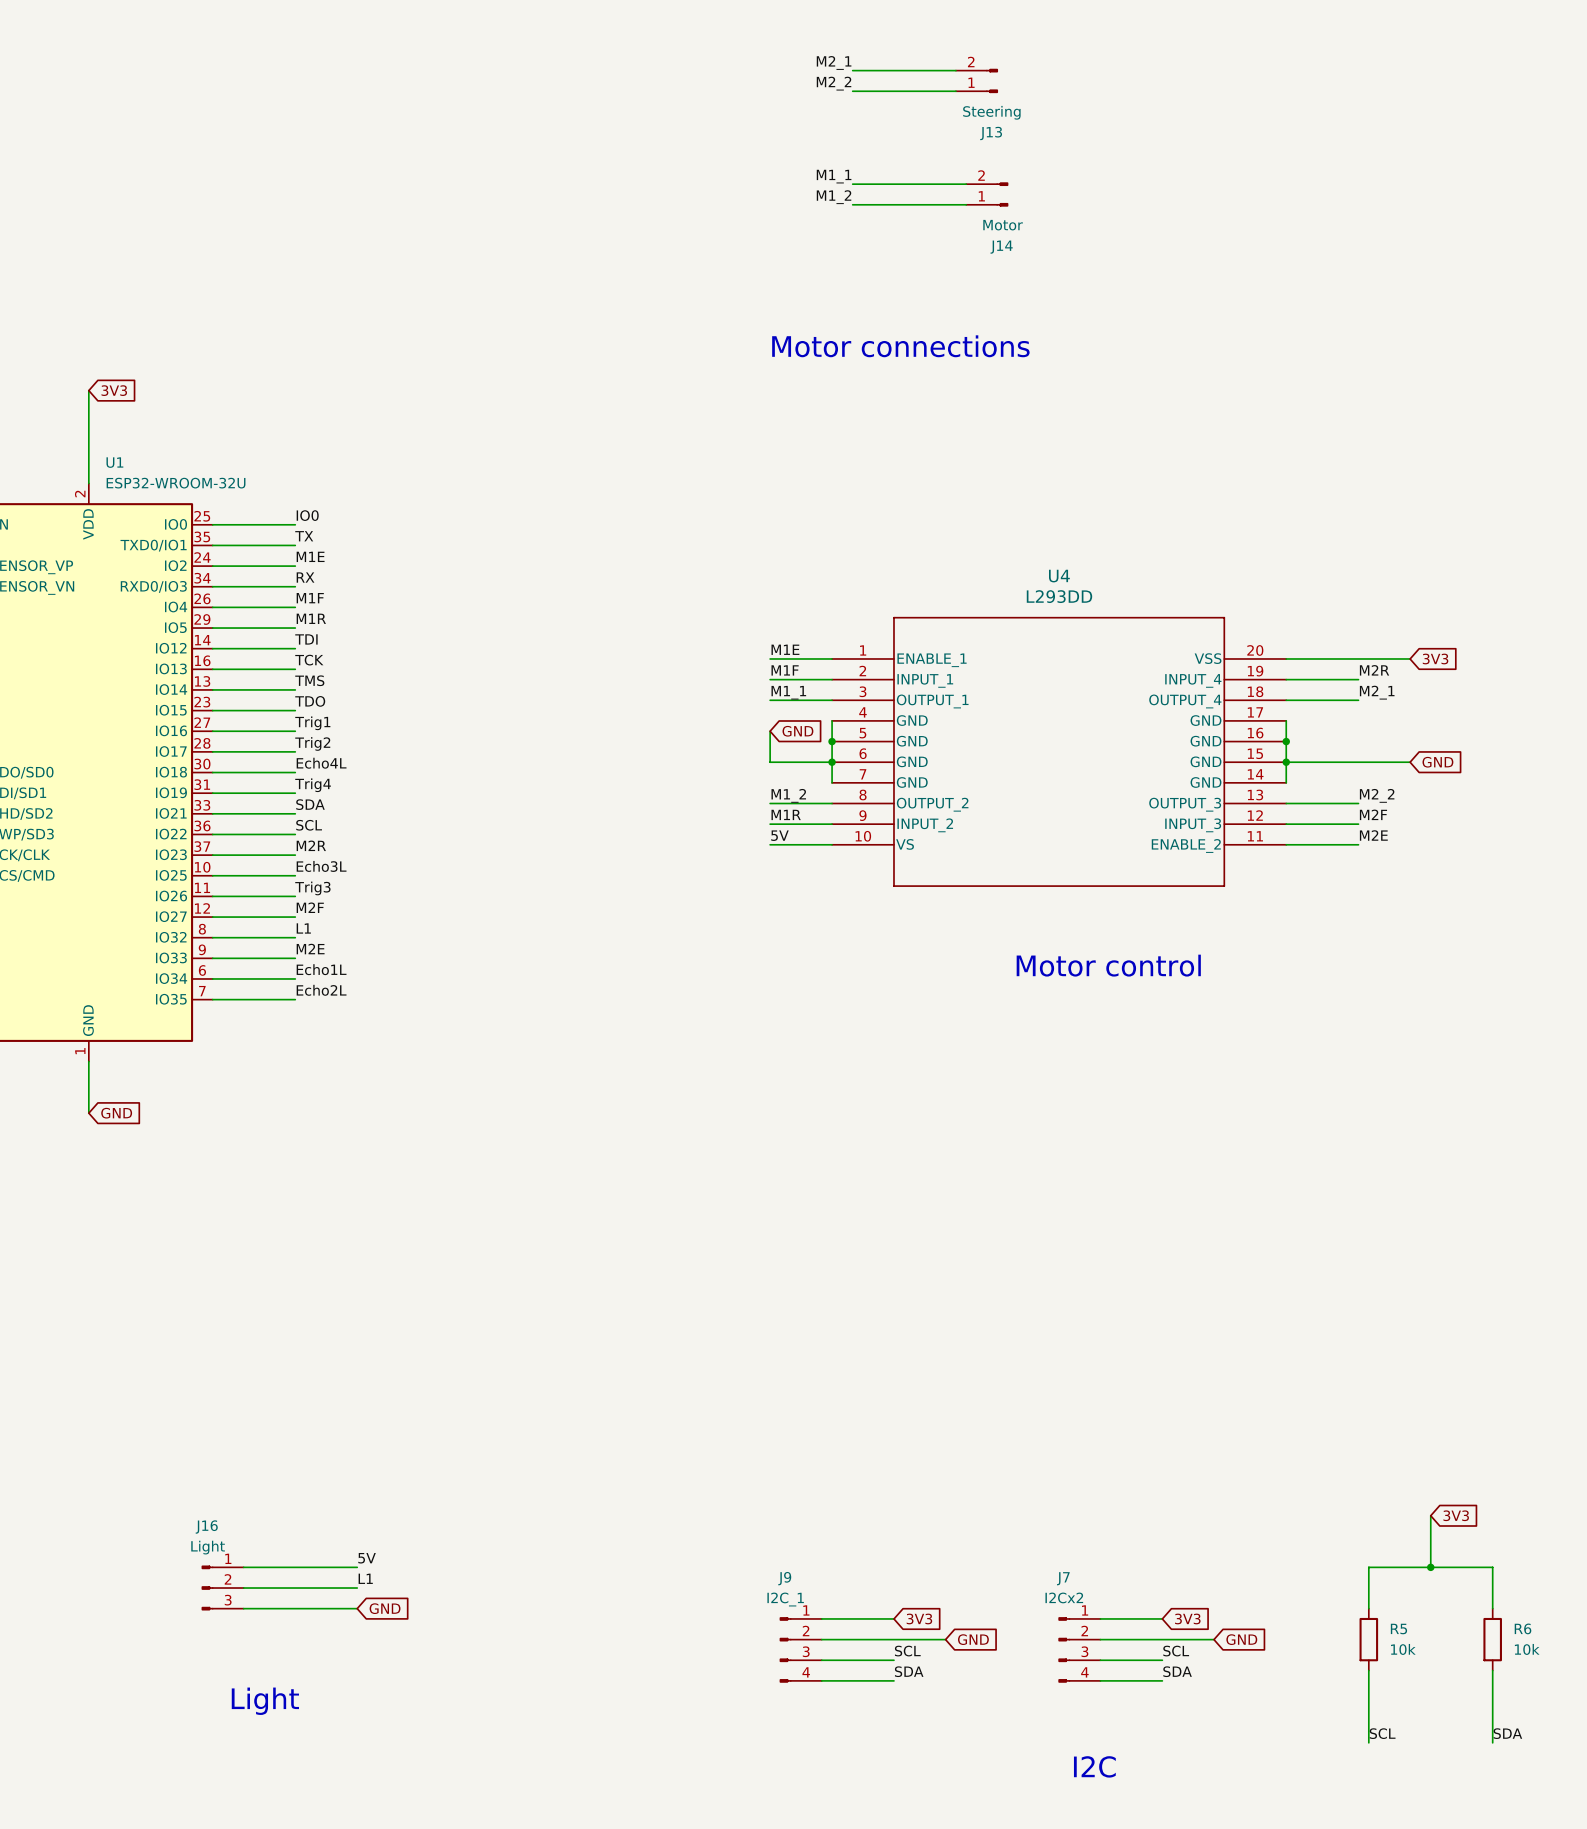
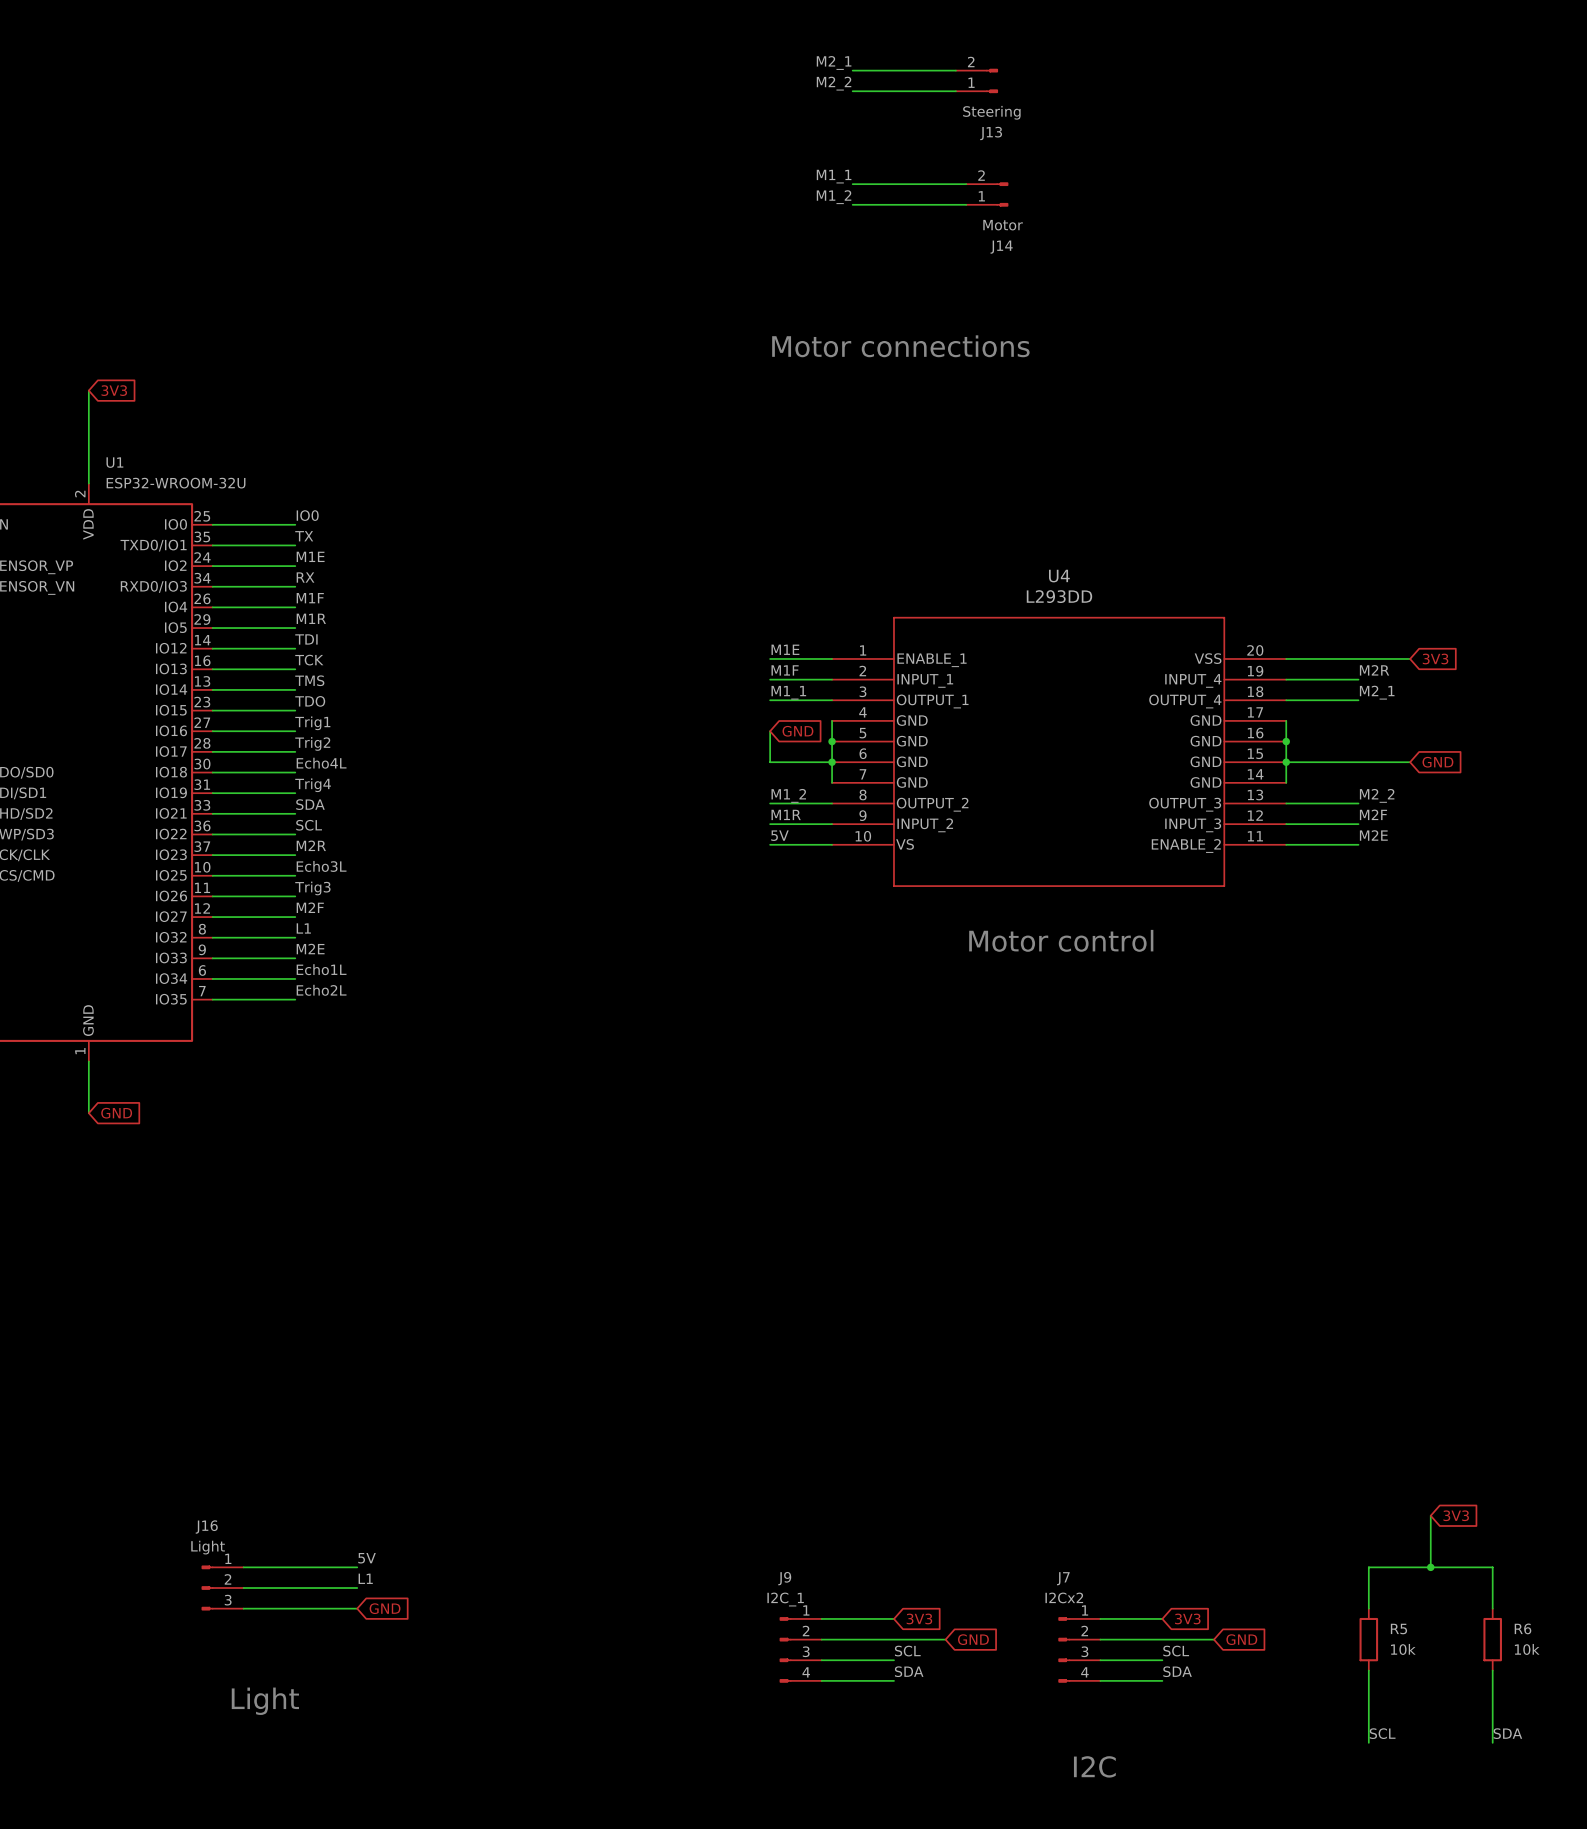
text position: Motor control (1108, 965) -> Motor control (1061, 940)

